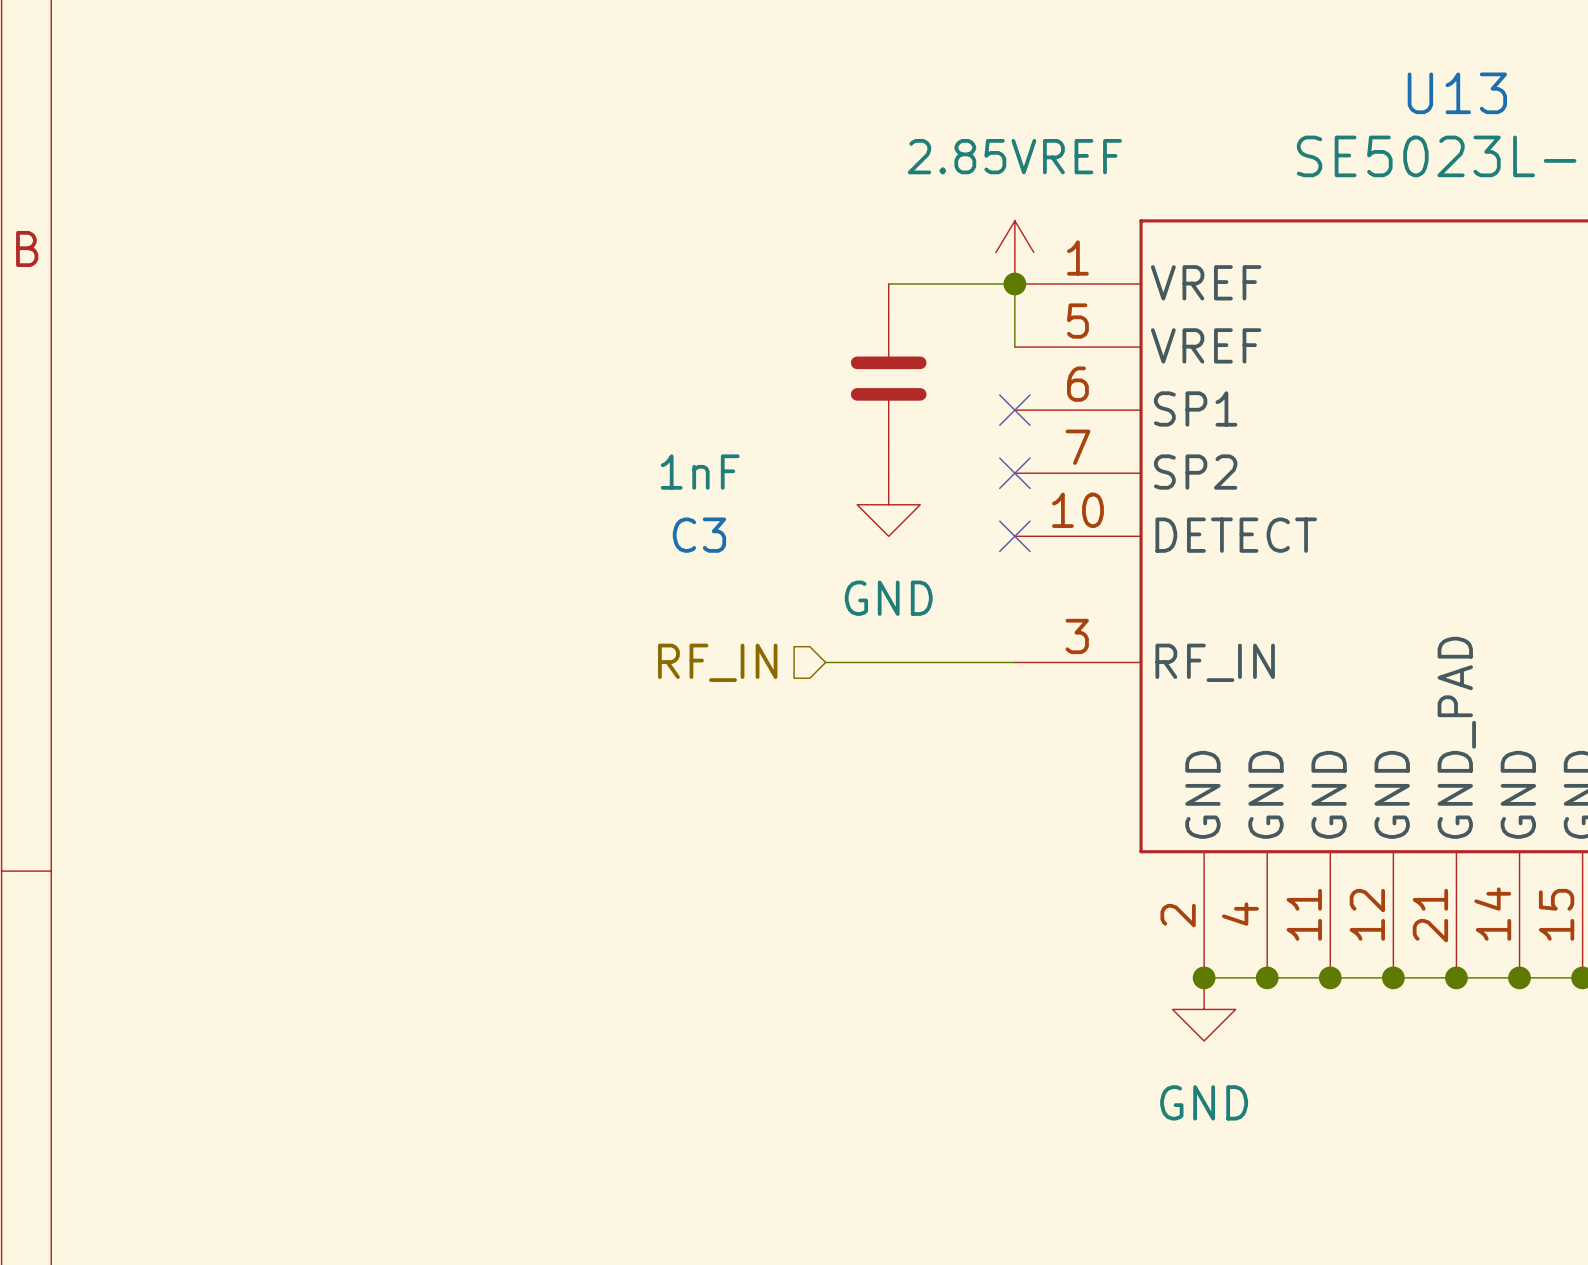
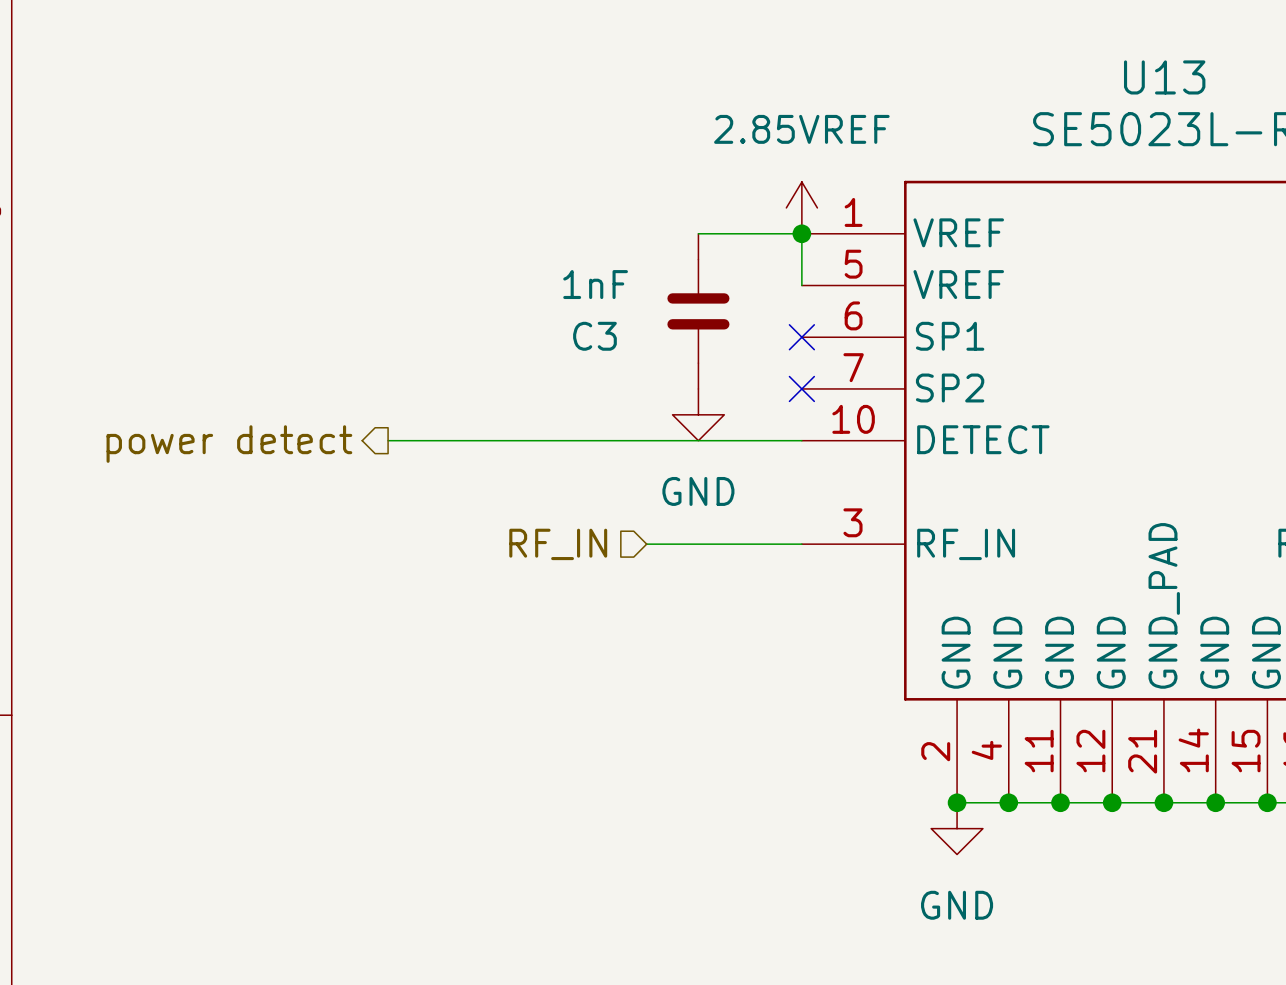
C3 value position: 1nF (700, 472) -> 1nF (595, 284)
C3 name position: C3 (699, 535) -> C3 (594, 336)
wire: none -> (388, 440) (801, 440)
no-connect mark: (1014, 536) -> none
hierarchical label: none -> power detect (229, 444)

